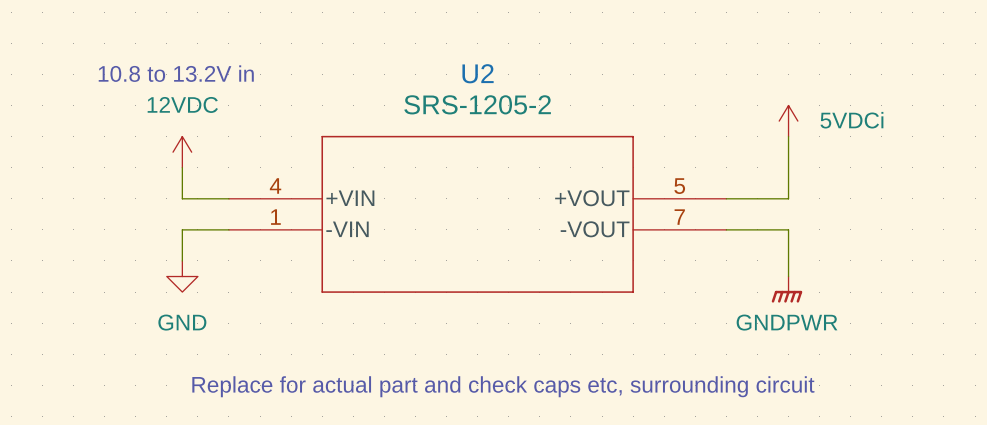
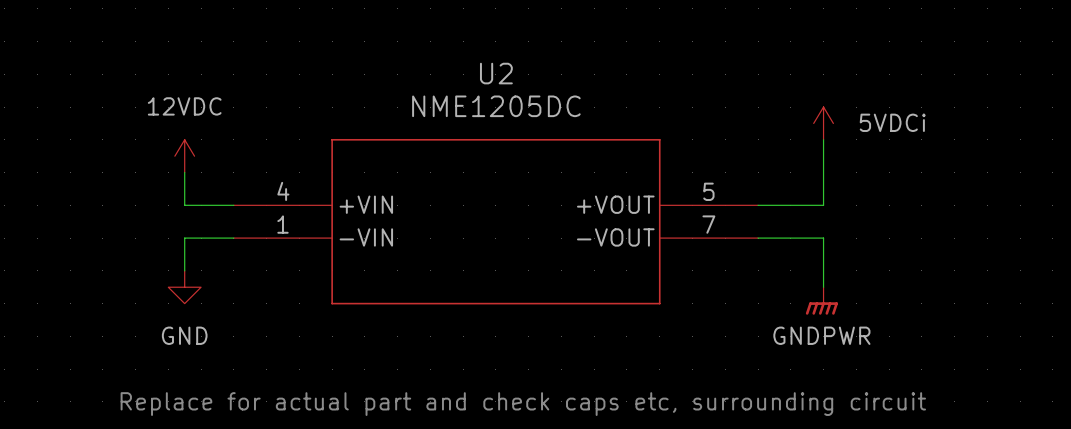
text: 10.8 to 13.2V in (176, 73) -> none
U2 value: SRS-1205-2 (477, 104) -> NME1205DC (496, 106)

